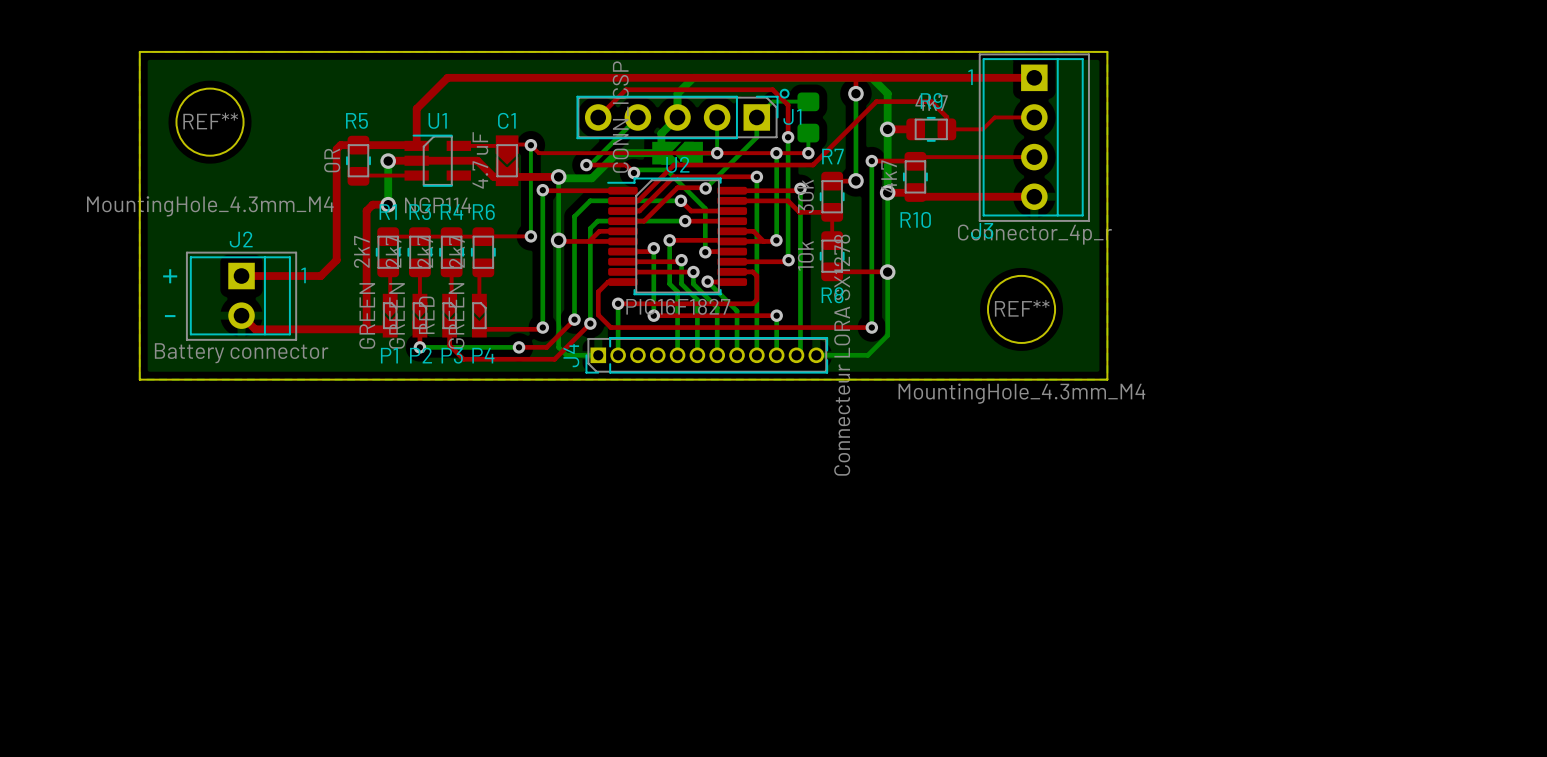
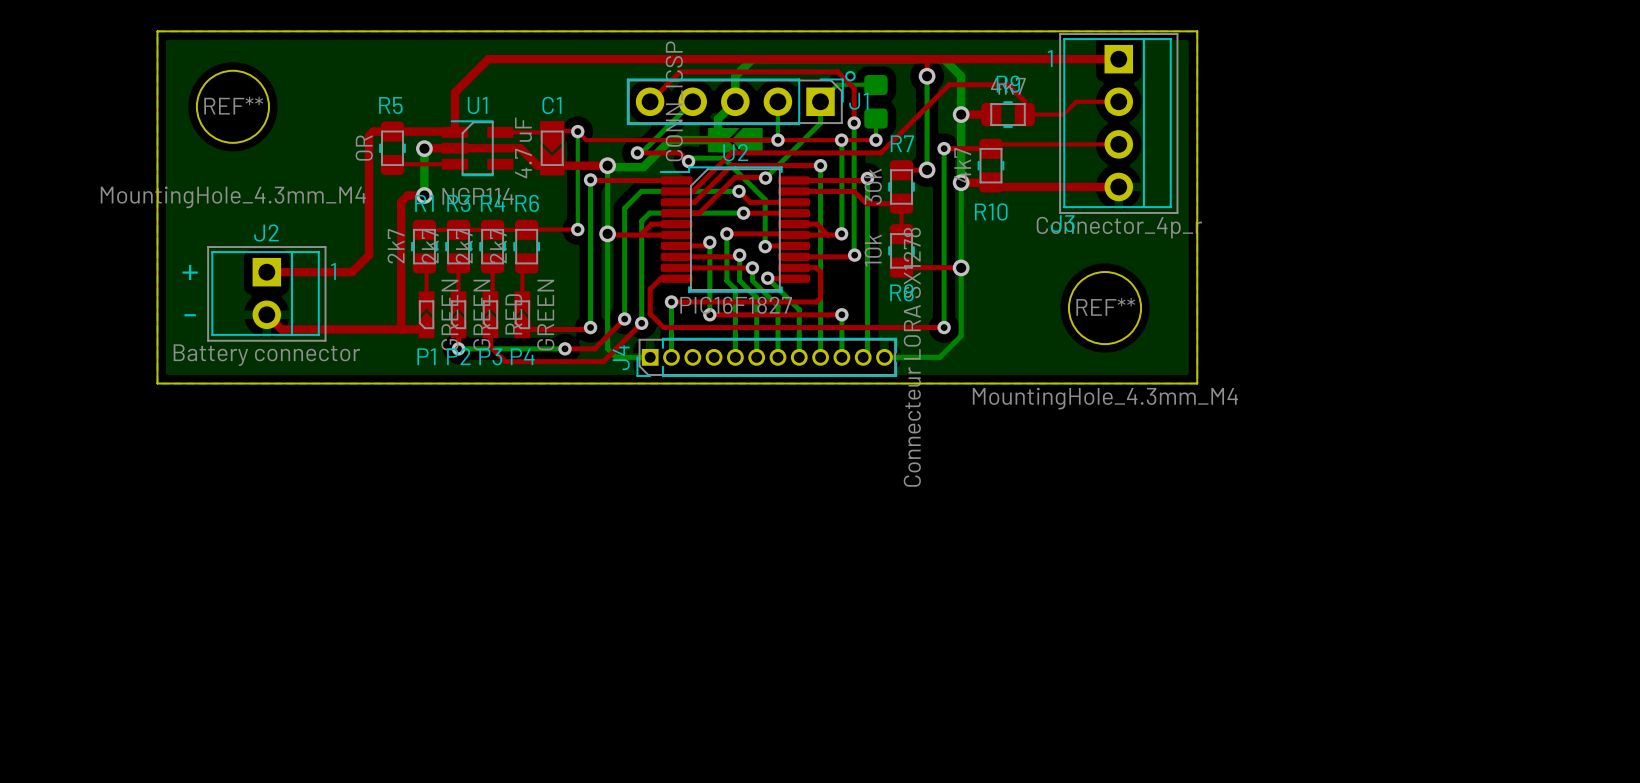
P1 rotation: 0° (390, 315) -> 180° (426, 314)
P2 rotation: 0° (419, 315) -> 180° (458, 314)
P3 rotation: 0° (449, 315) -> 180° (490, 314)
P4 rotation: 0° (479, 315) -> 180° (522, 314)

